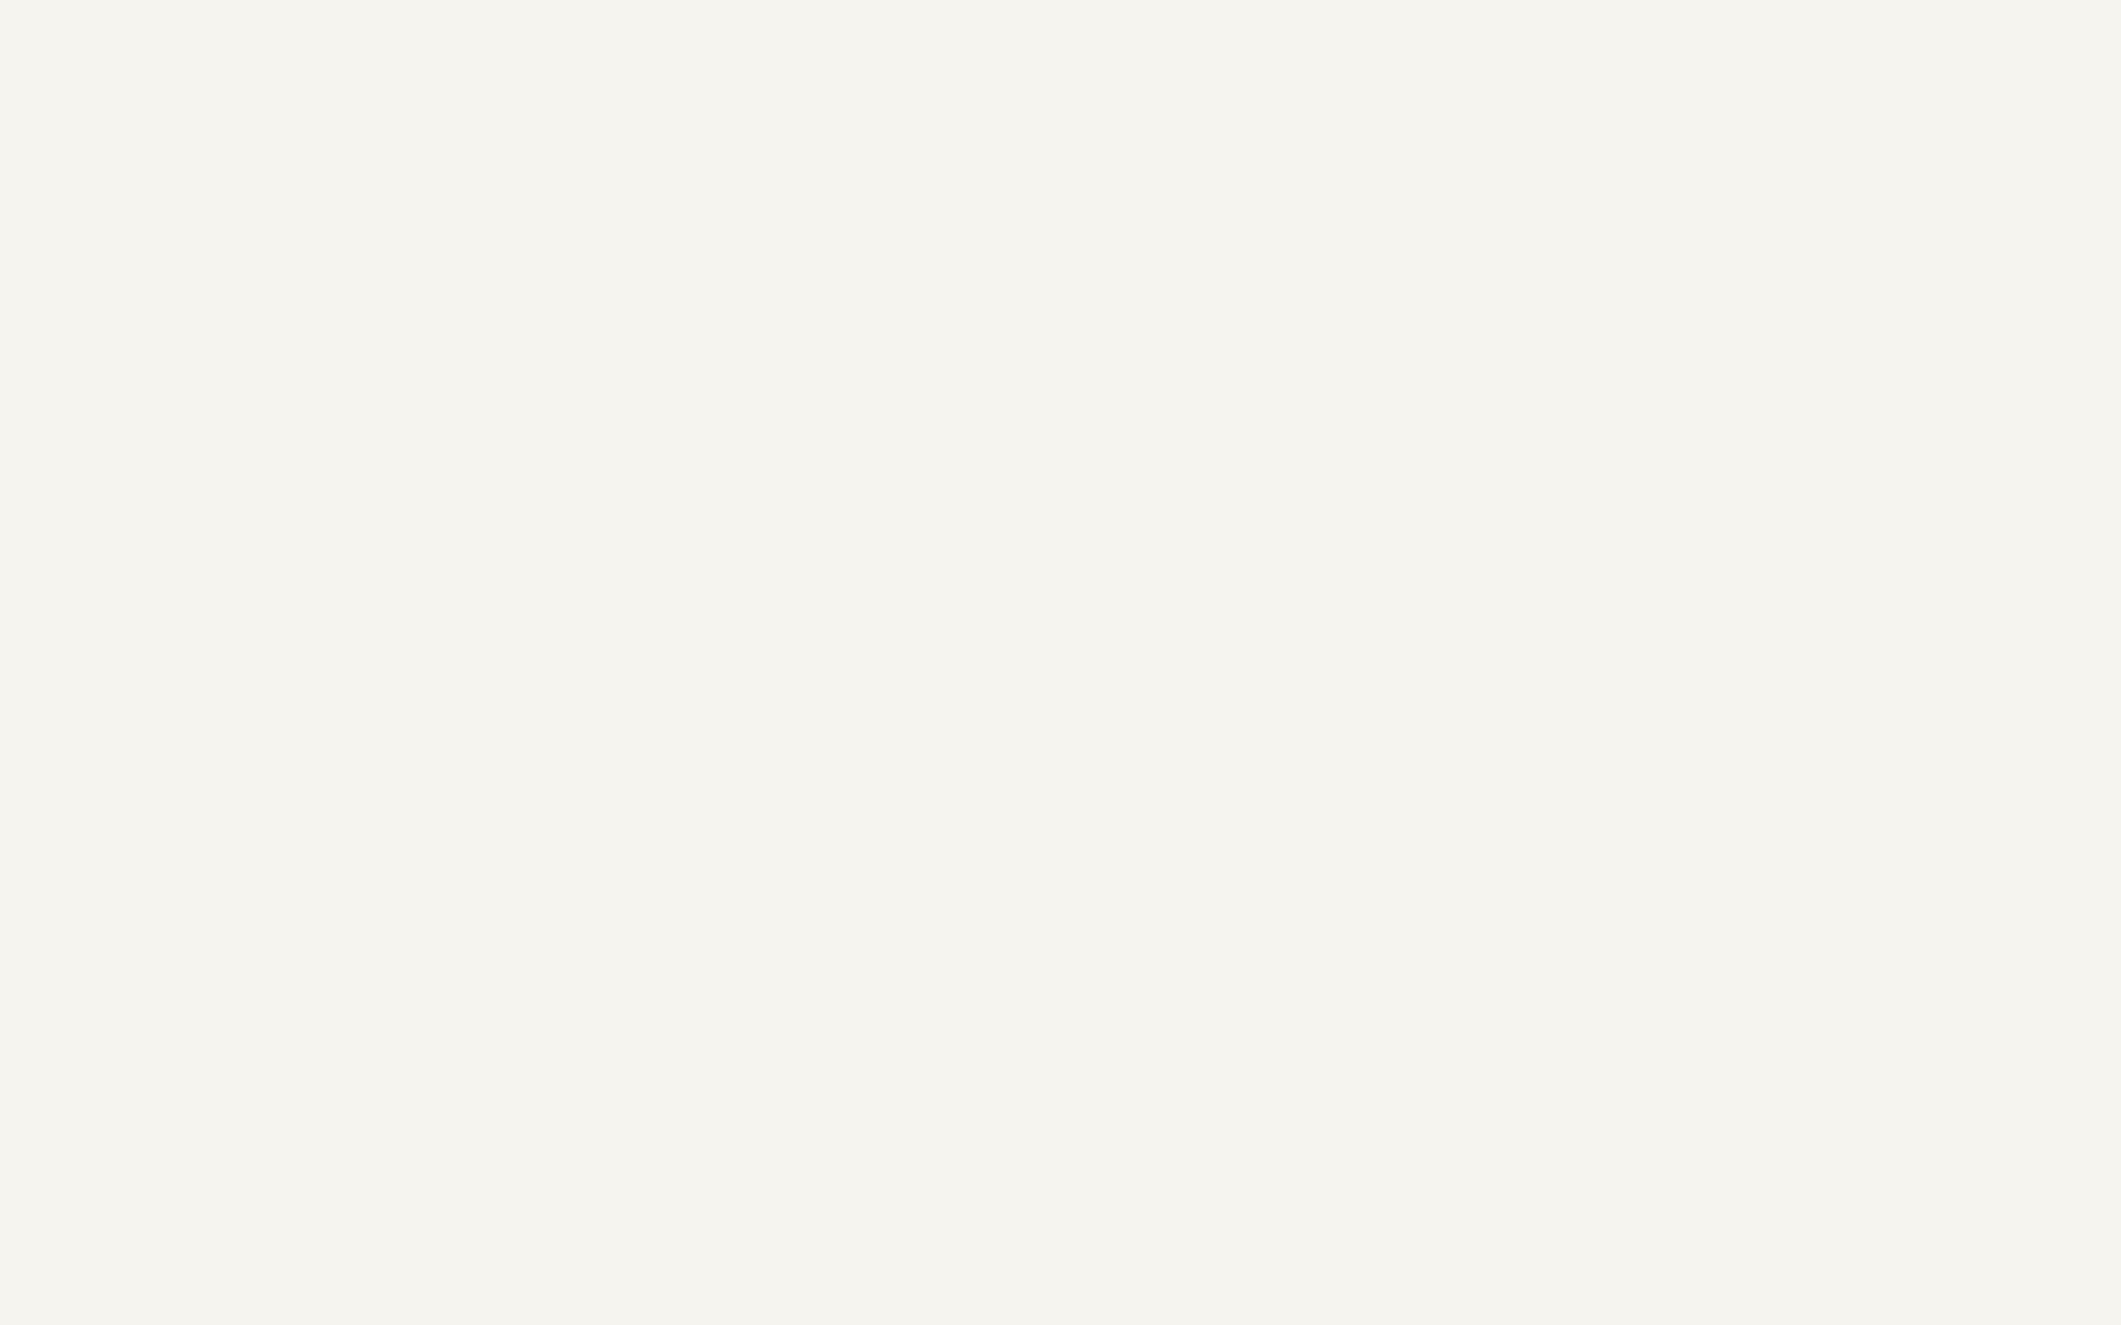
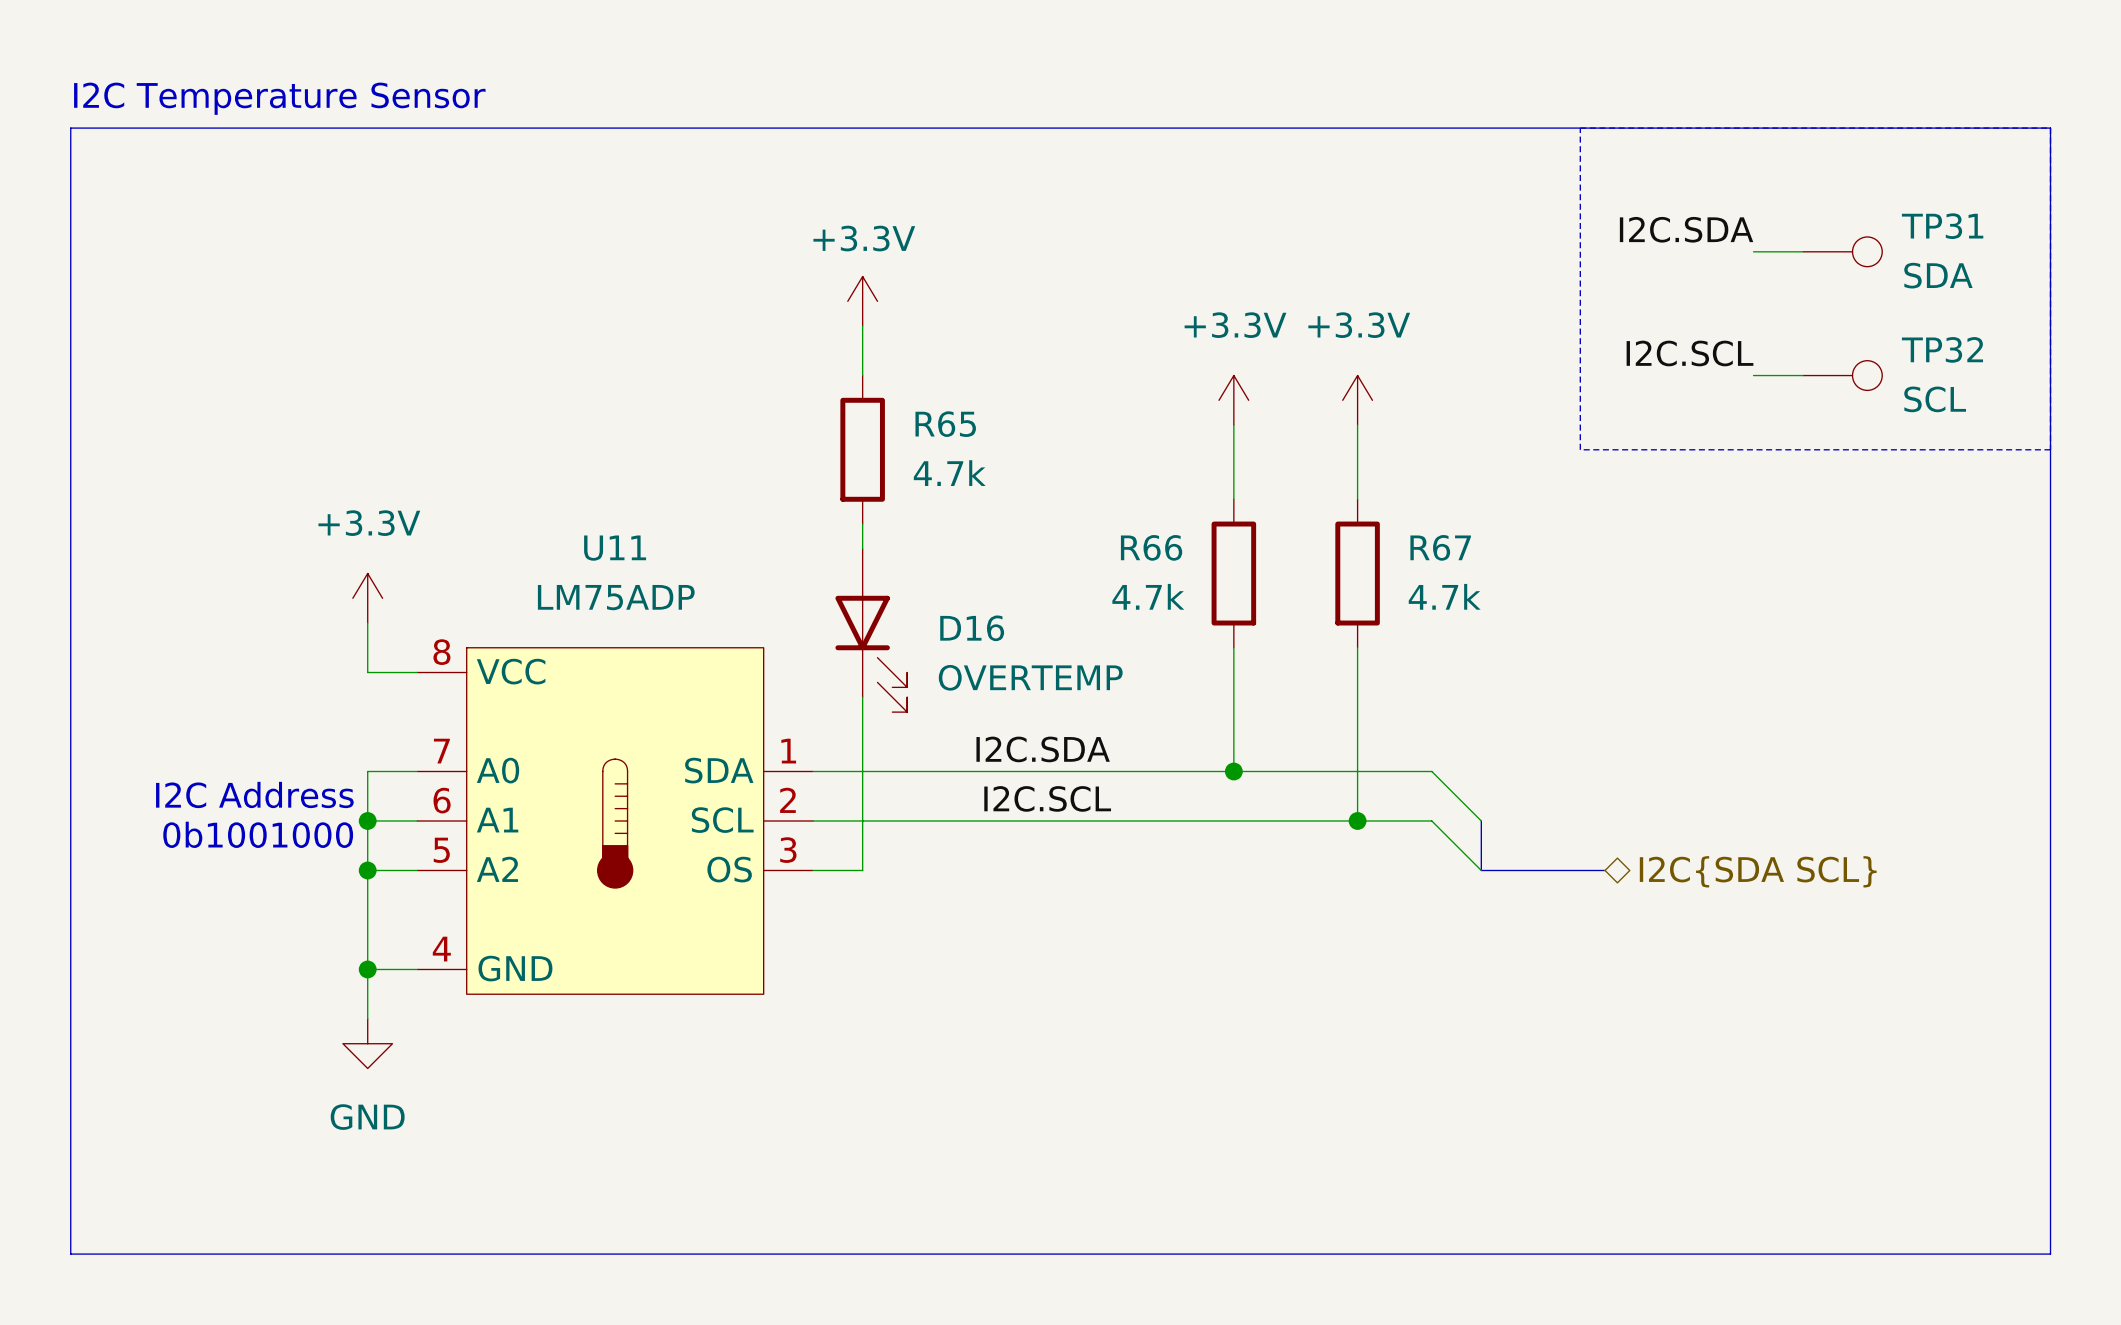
text: none -> I2C Temperature Sensor (279, 98)
line: none -> (2050, 128) (70, 128) (70, 1254) (2050, 1254) (2050, 128)
line: none -> (2050, 128) (1580, 128) (1580, 449) (2050, 449) (2050, 128)
label: none -> I2C.SDA (1686, 229)
wire: none -> (1753, 251) (1803, 251)
TP31: none -> SDA (1842, 251)
power symbol: none -> +3.3V (862, 301)
wire: none -> (862, 326) (862, 375)
label: none -> I2C.SCL (1689, 353)
wire: none -> (1753, 375) (1803, 375)
TP32: none -> SCL (1842, 375)
power symbol: none -> +3.3V (1233, 400)
power symbol: none -> +3.3V (1357, 400)
wire: none -> (1233, 425) (1233, 499)
wire: none -> (1357, 425) (1357, 499)
R65: none -> 4.7k (862, 449)
wire: none -> (862, 524) (862, 548)
R66: none -> 4.7k (1233, 573)
R67: none -> 4.7k (1357, 573)
power symbol: none -> +3.3V (367, 598)
wire: none -> (367, 623) (367, 672) (417, 672)
D16: none -> OVERTEMP (871, 630)
wire: none -> (1233, 647) (1233, 771)
wire: none -> (1357, 647) (1357, 820)
wire: none -> (862, 697) (862, 870) (813, 870)
label: none -> I2C.SDA (1043, 749)
wire: none -> (417, 771) (367, 771) (367, 1018)
wire: none -> (813, 771) (1431, 771) (1481, 820)
junction: none -> (1233, 771)
text: none -> I2C Address (254, 794)
label: none -> I2C.SCL (1047, 798)
wire: none -> (367, 820) (417, 820)
junction: none -> (367, 820)
U11: none -> LM75ADP (615, 820)
wire: none -> (813, 820) (1431, 820) (1481, 870)
junction: none -> (1357, 820)
bus: none -> (1481, 820) (1481, 870) (1605, 870)
text: none -> 0b1001000 (258, 834)
wire: none -> (367, 870) (417, 870)
junction: none -> (367, 870)
hierarchical label: none -> I2C{SDA SCL} (1758, 871)
wire: none -> (367, 969) (417, 969)
junction: none -> (367, 969)
power symbol: none -> GND (367, 1043)

